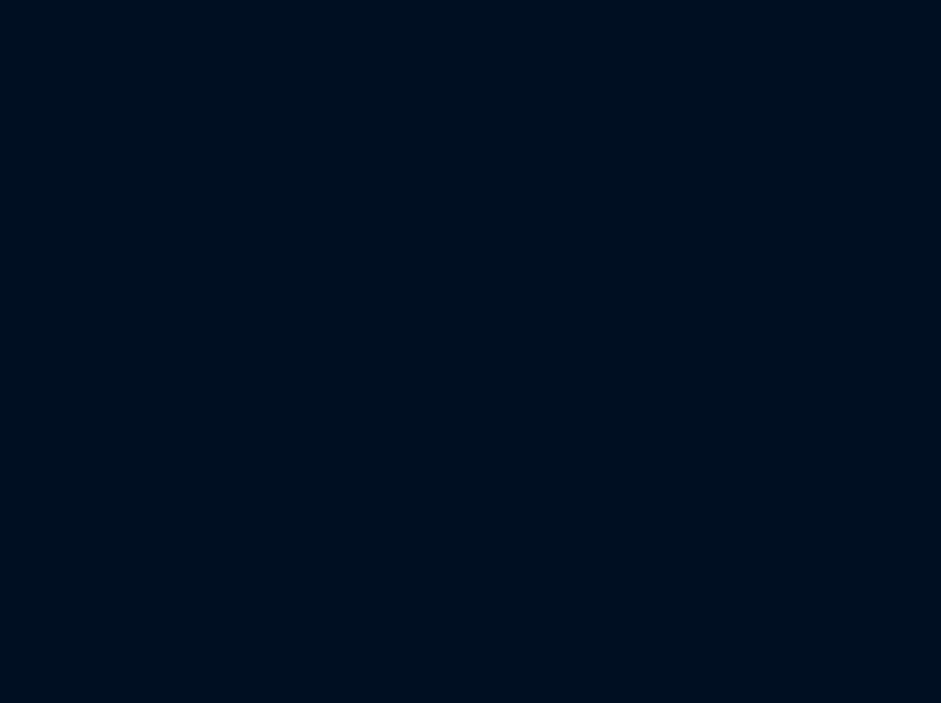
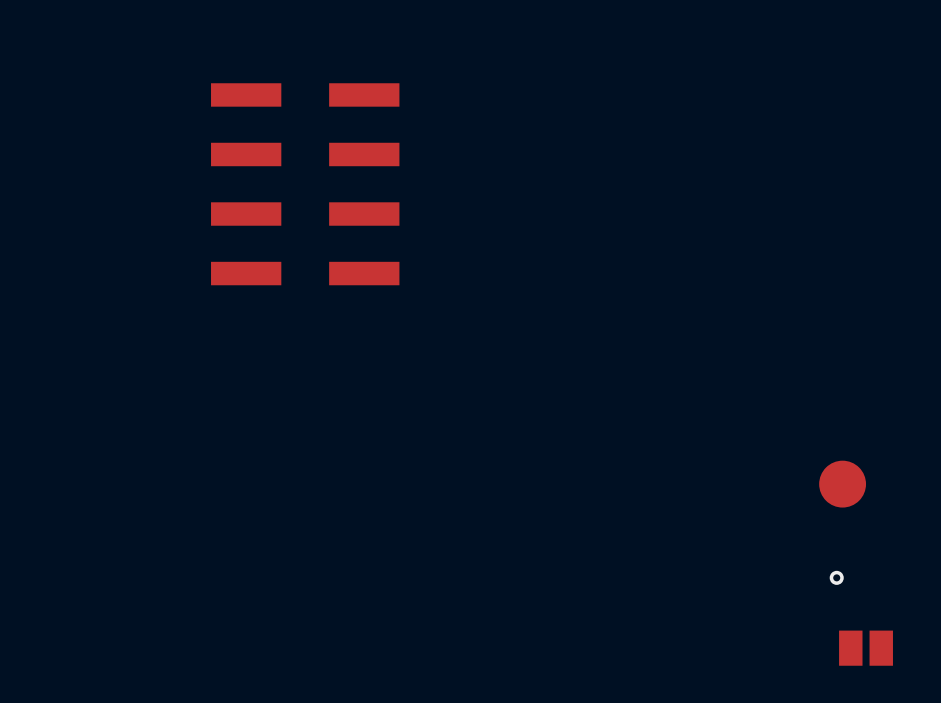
part: none -> (305, 184)
part: none -> (842, 484)
via: none -> (836, 577)
part: none -> (866, 648)

